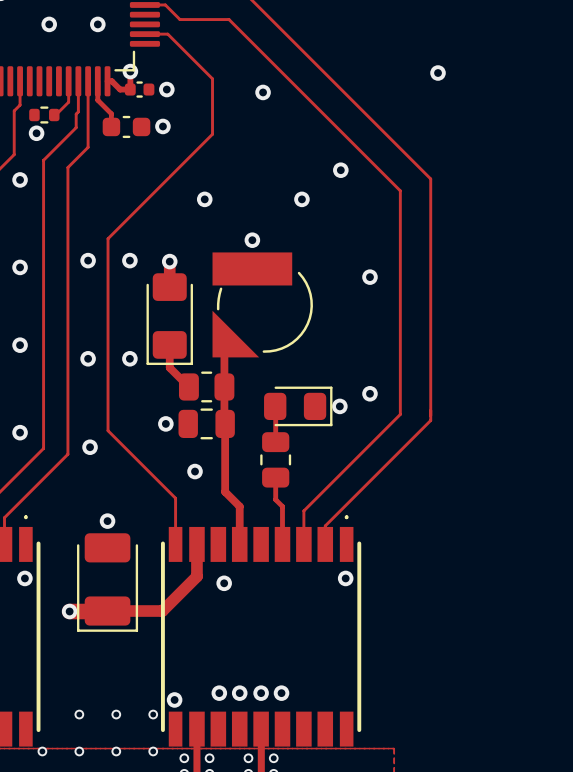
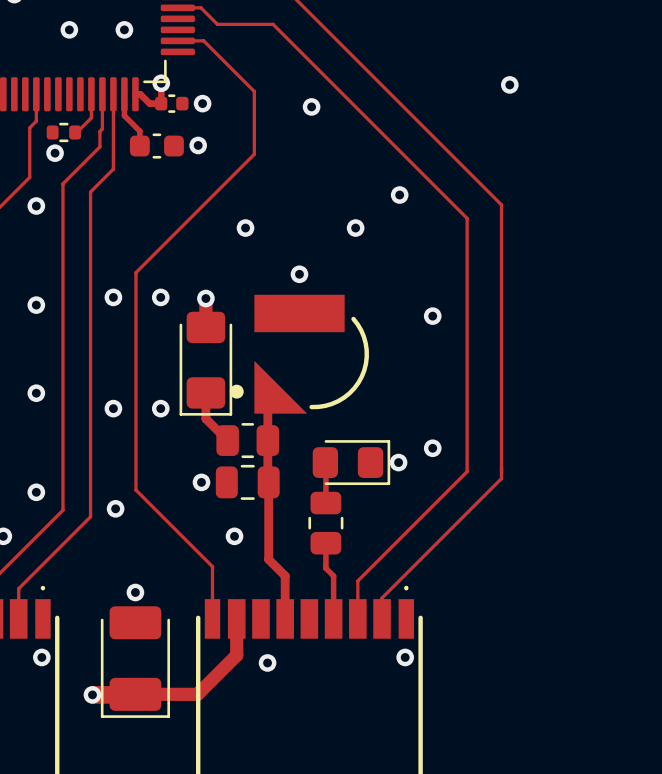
part footprint: [212, 252, 313, 358] -> [229, 294, 369, 414]

